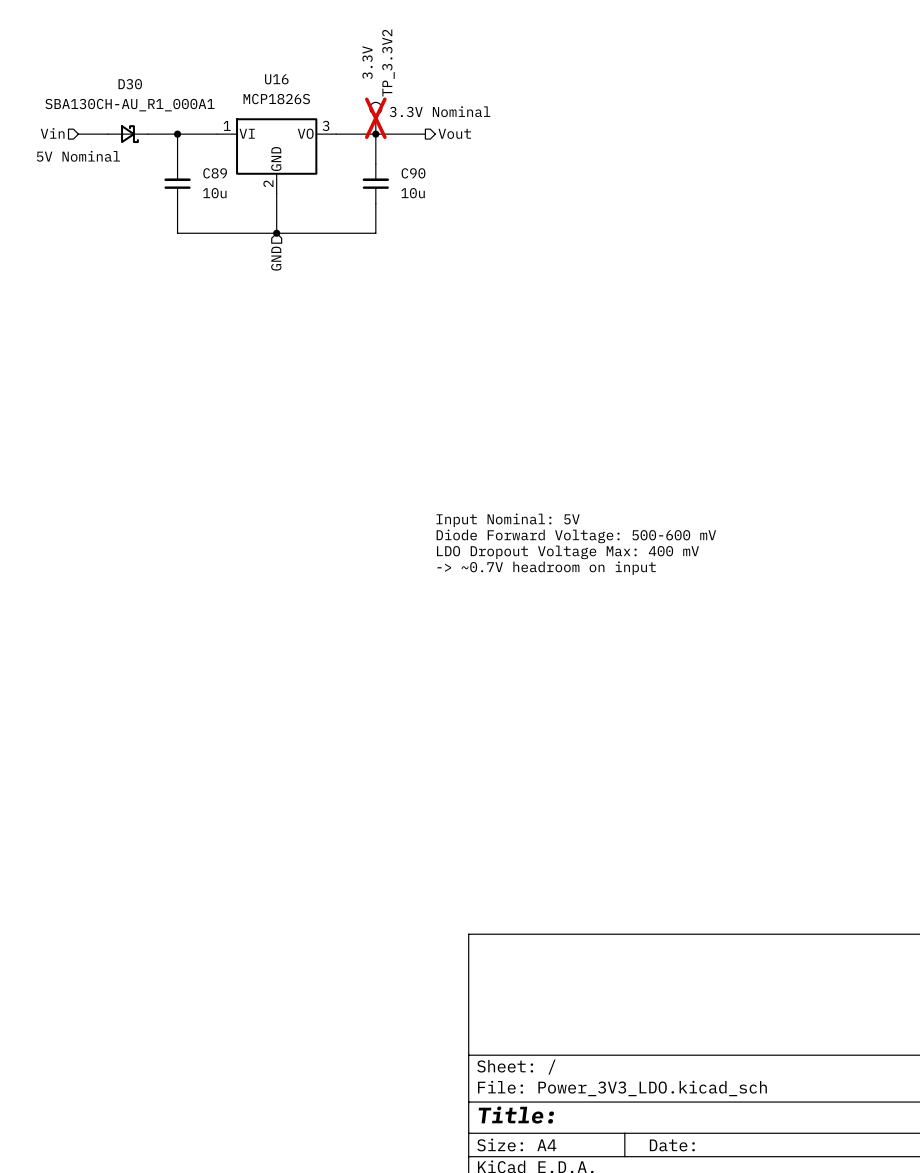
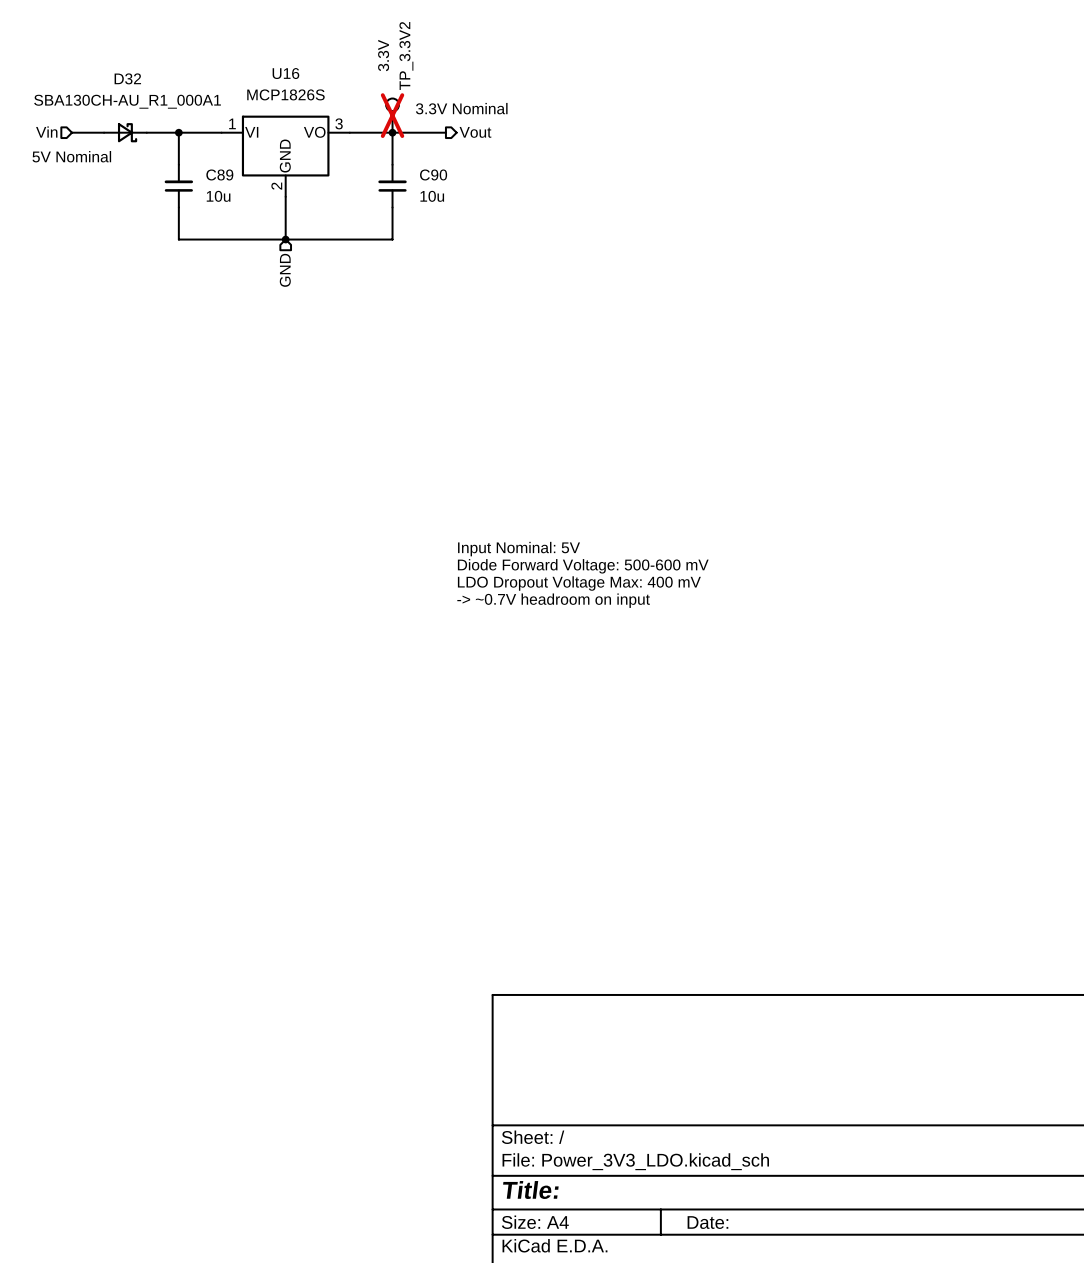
D30 name: D30 (130, 84) -> D32 (127, 78)

